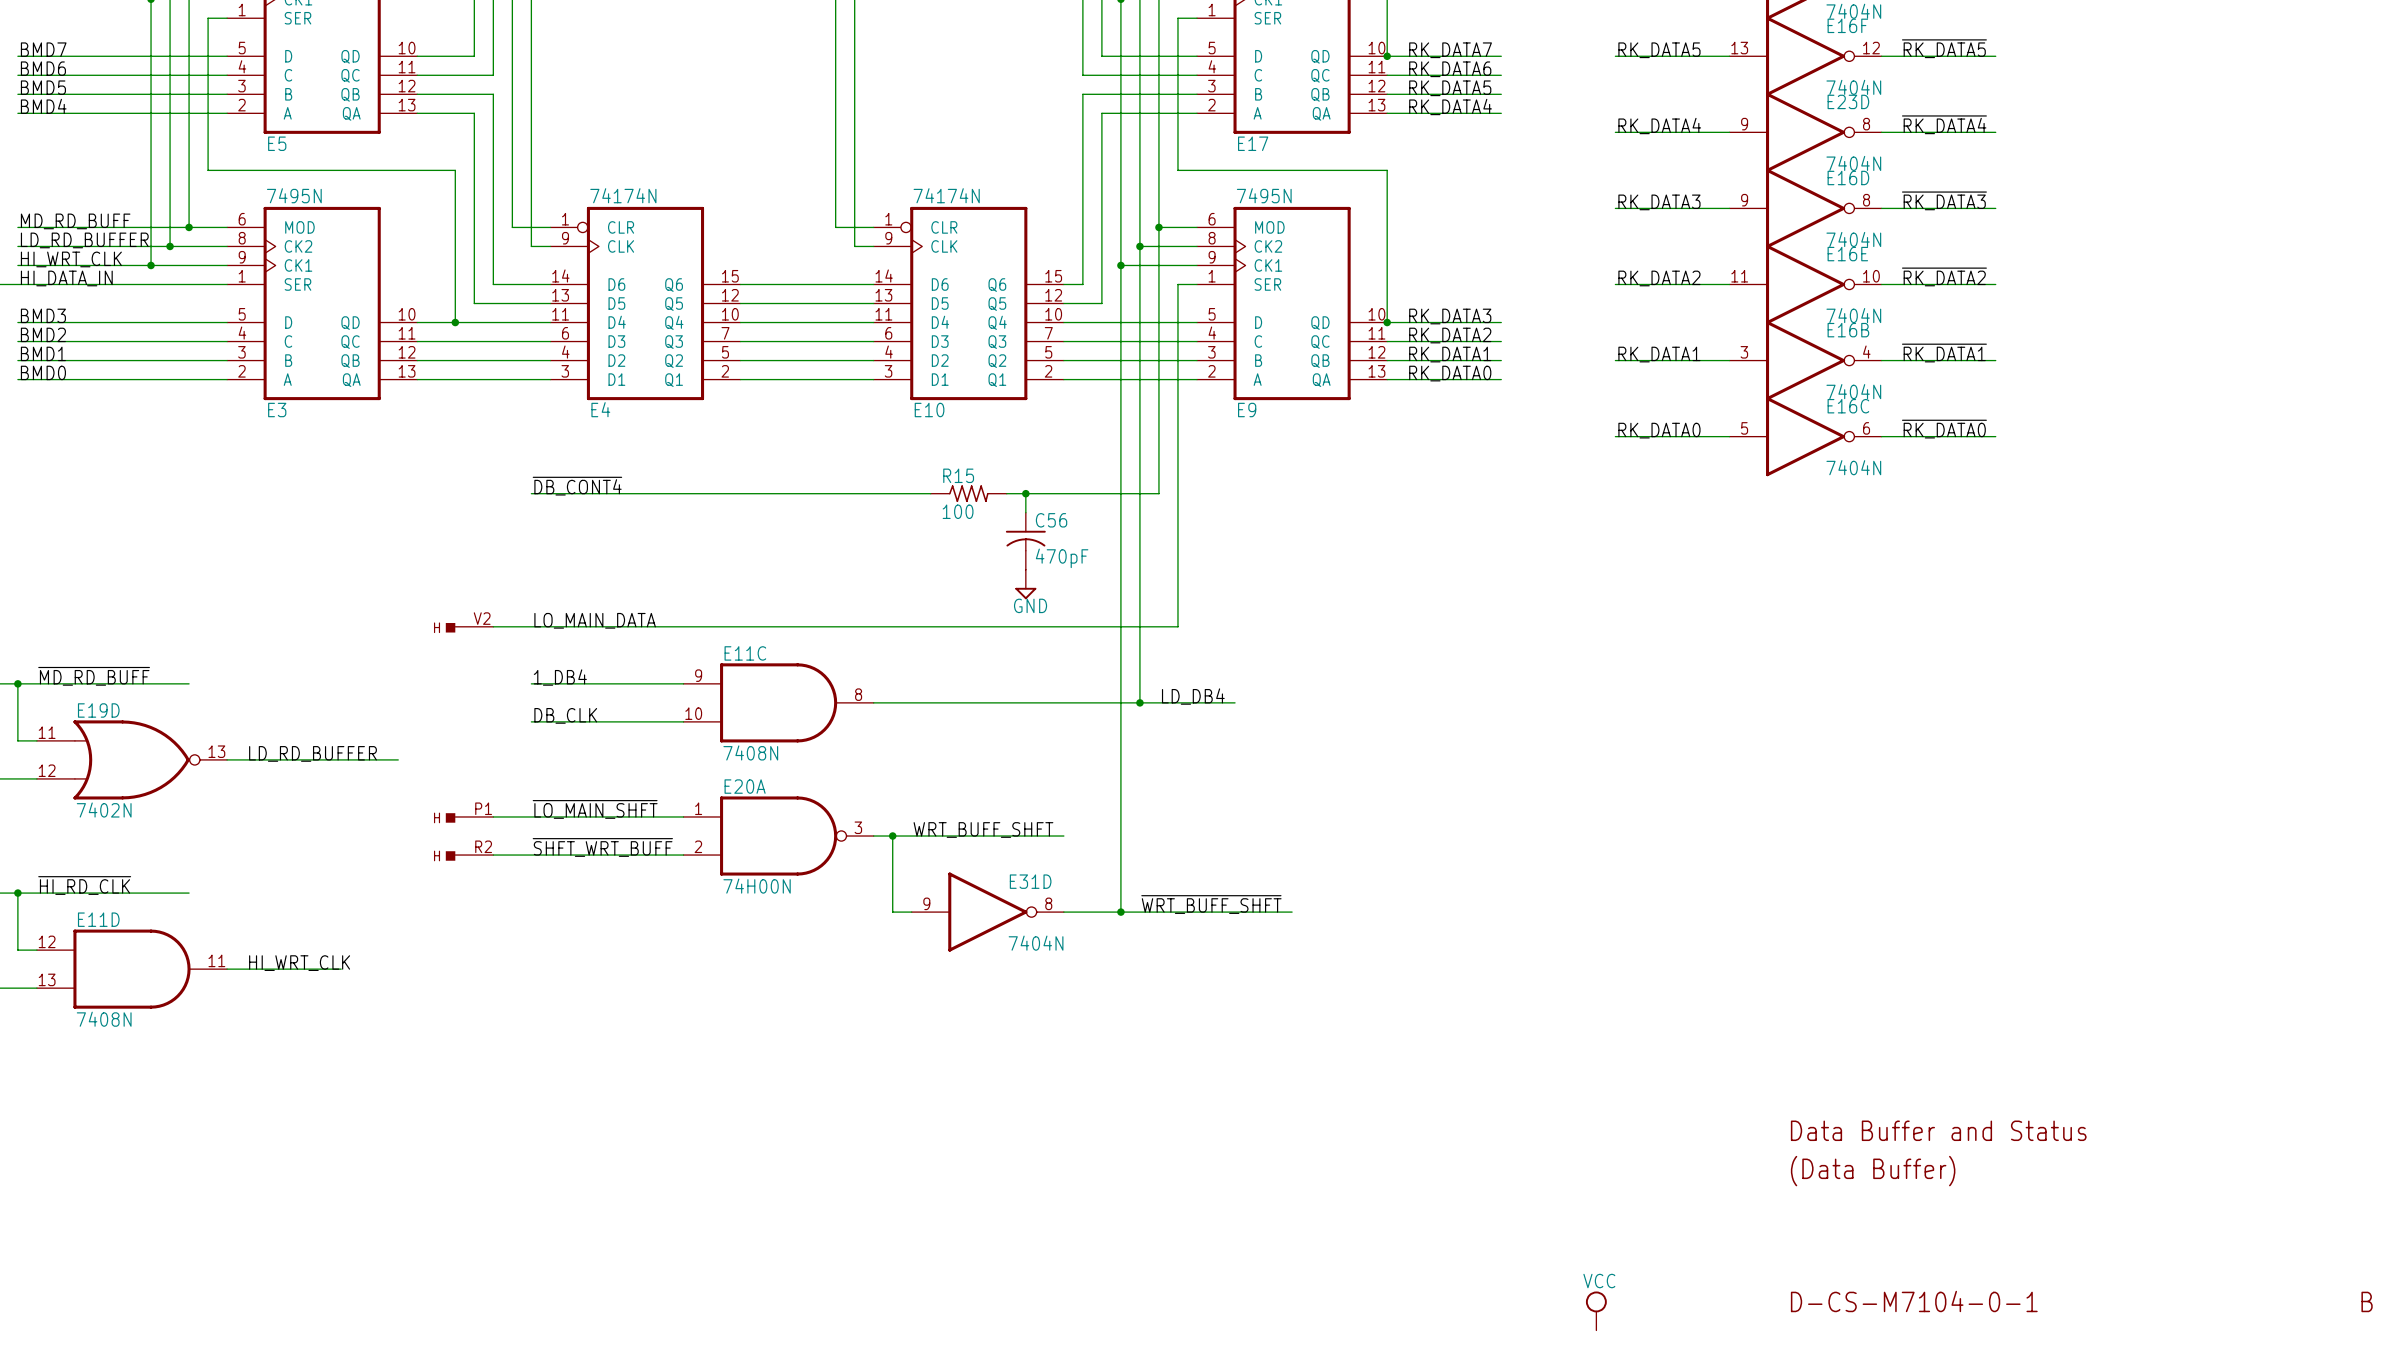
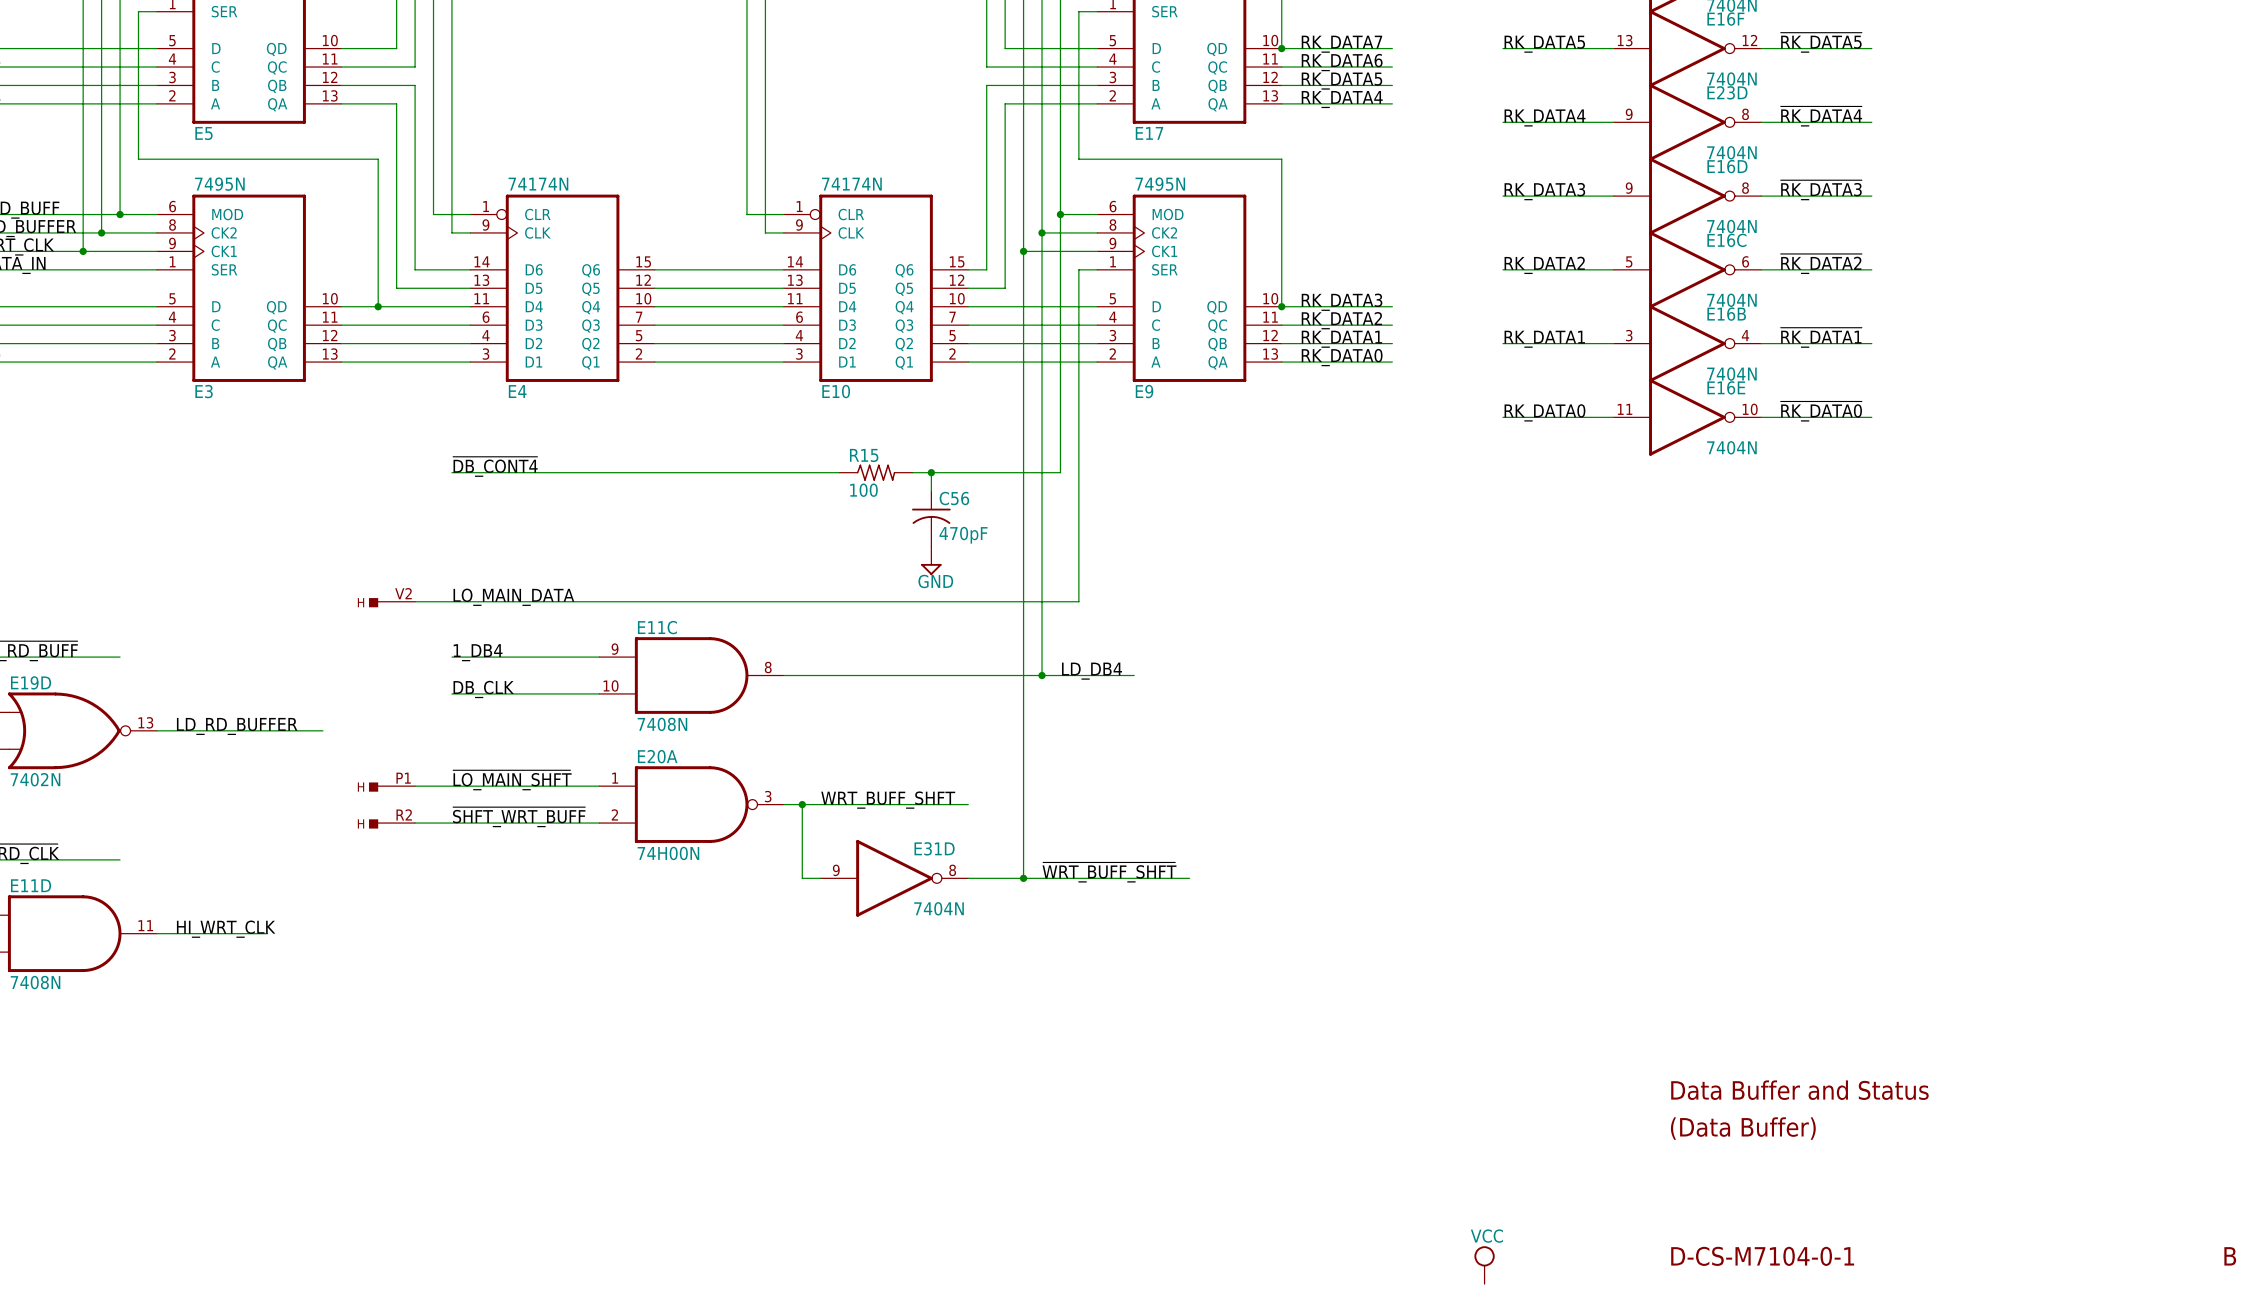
E16E position: (1805, 284) -> (1687, 417)
E16C position: (1805, 436) -> (1687, 269)

